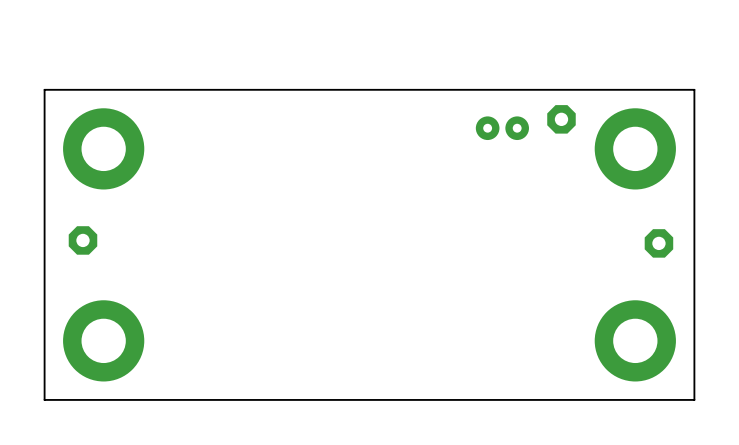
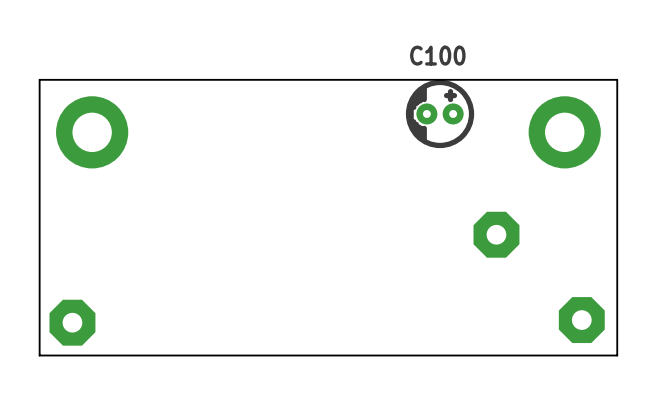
part: (561, 119) -> none
C100 side: top (502, 128) -> bottom (440, 113)
part: (82, 240) -> none
part: (658, 243) -> none
part: none -> (496, 234)
via: (103, 340) -> none
via: (635, 340) -> none
part: none -> (581, 320)
part: none -> (72, 322)

